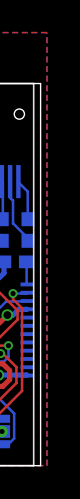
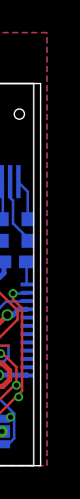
via: (8, 345) -> none
via: none -> (16, 385)
via: none -> (18, 396)
via: none -> (10, 417)

